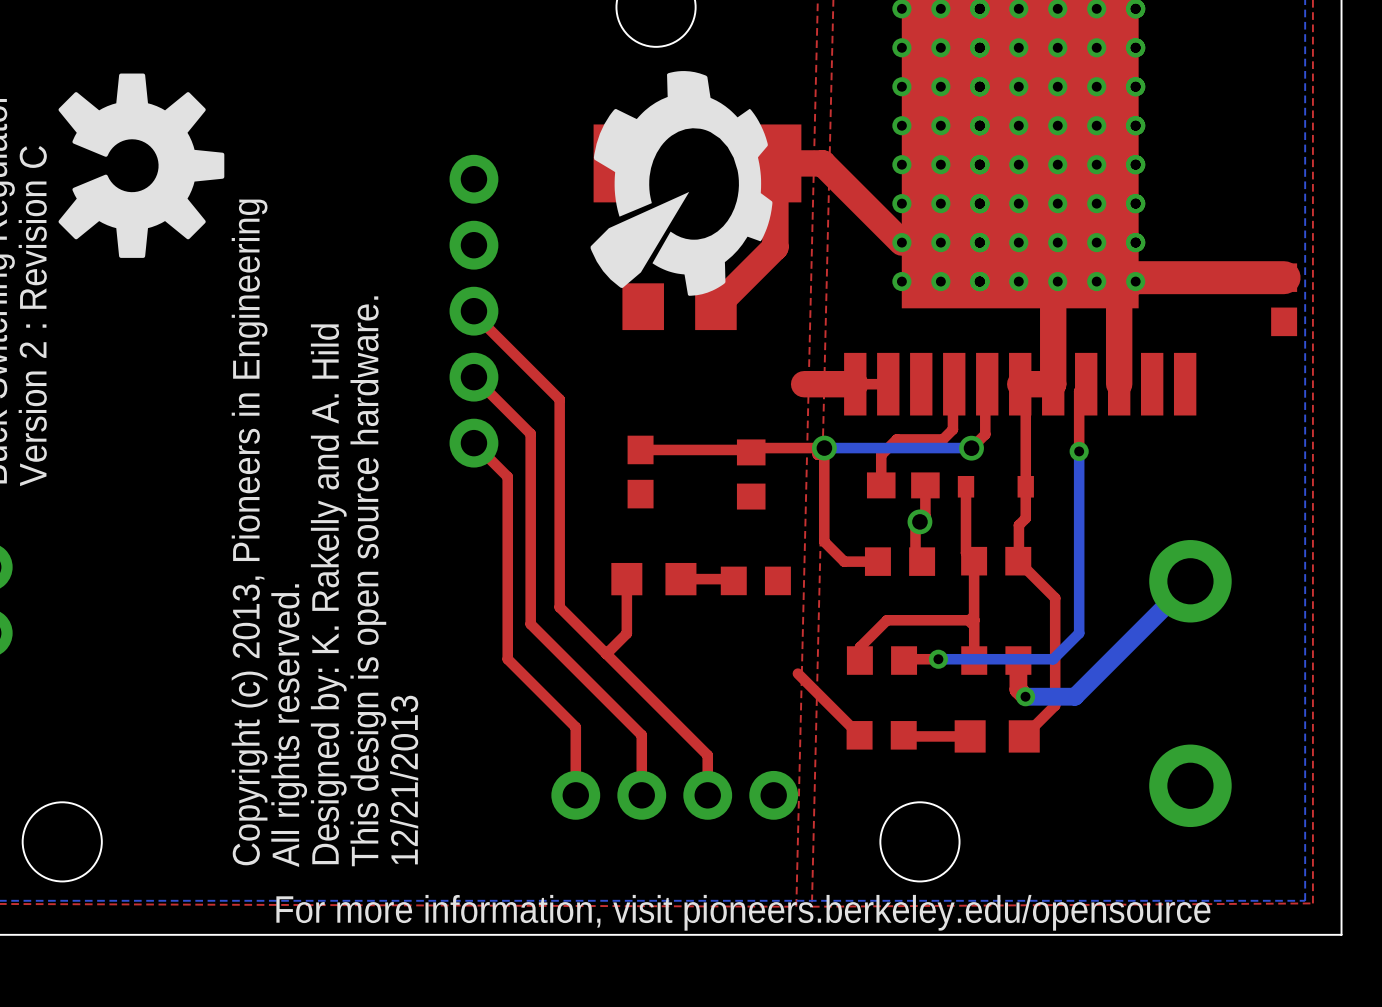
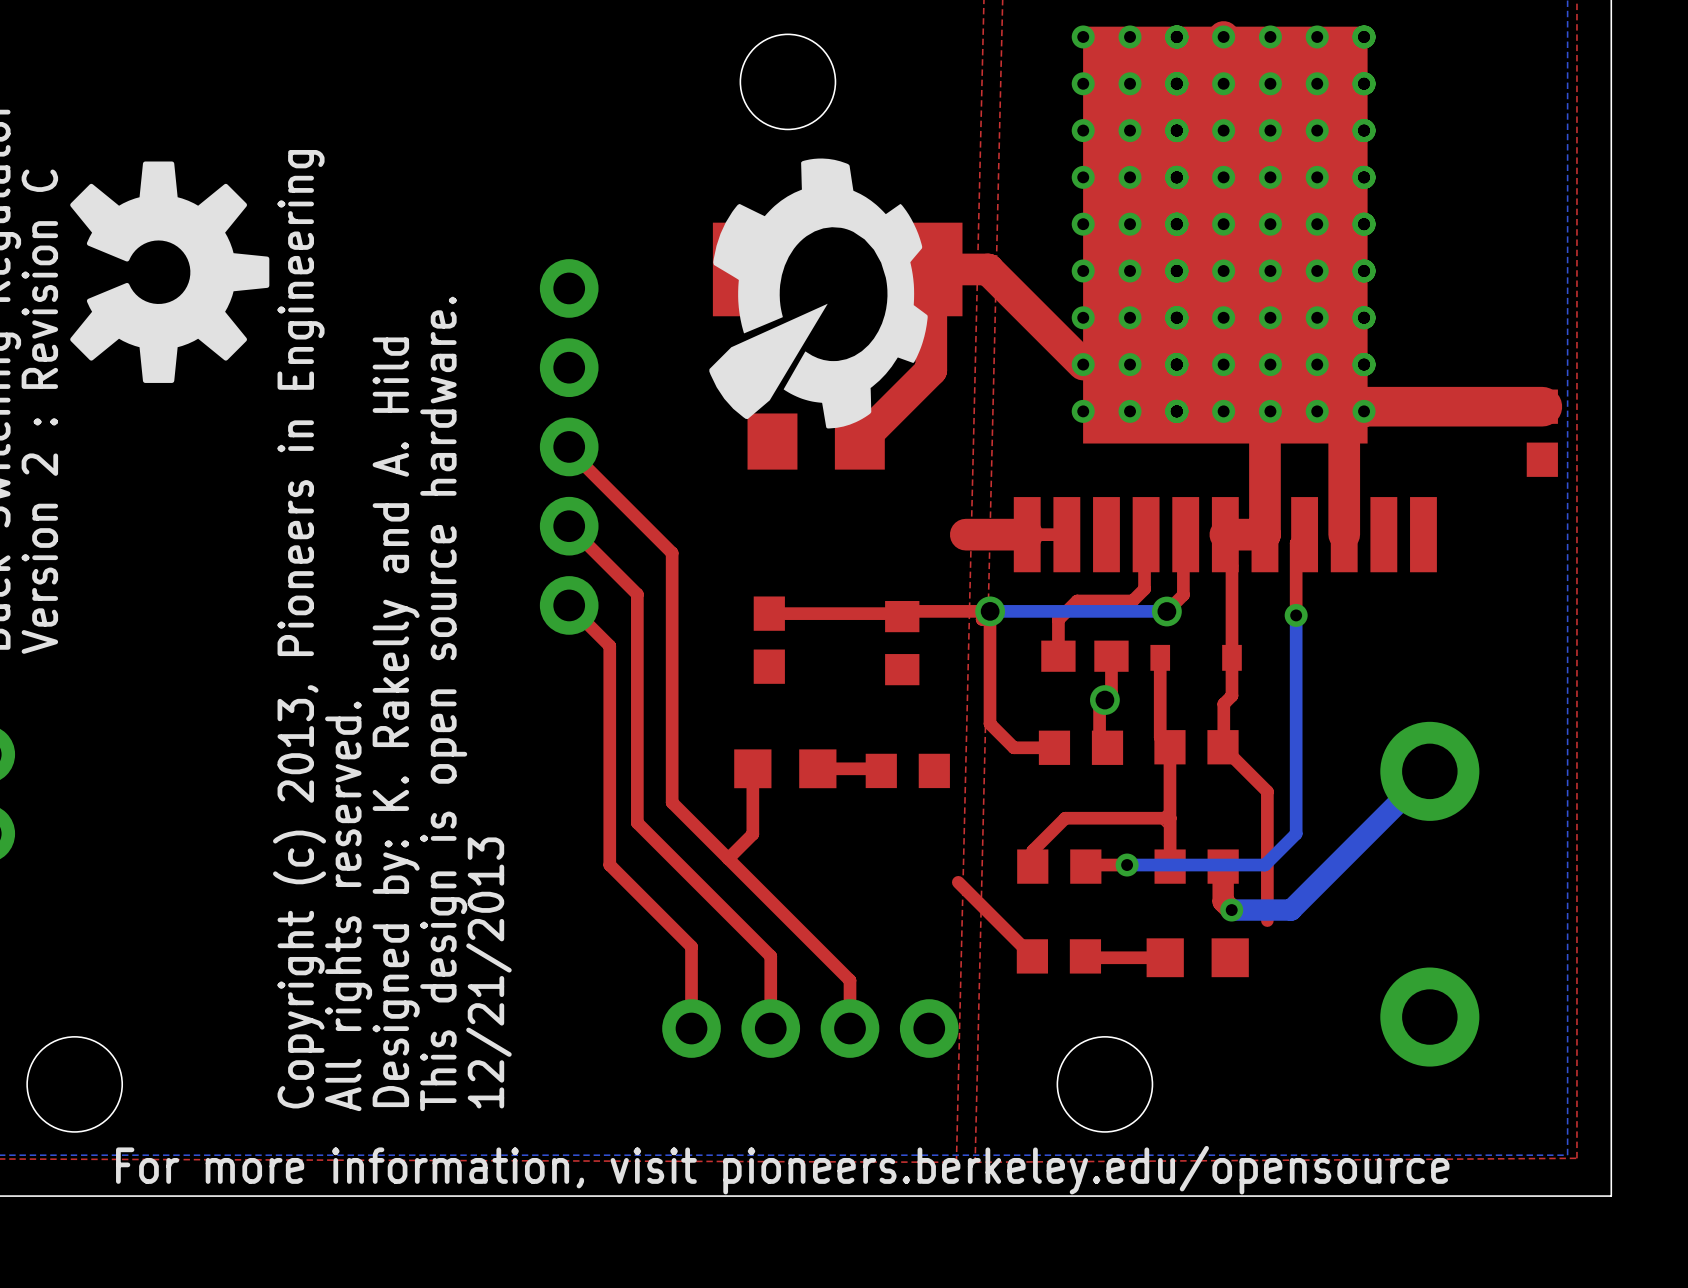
top track: (1055, 705) (1024, 736) -> none

